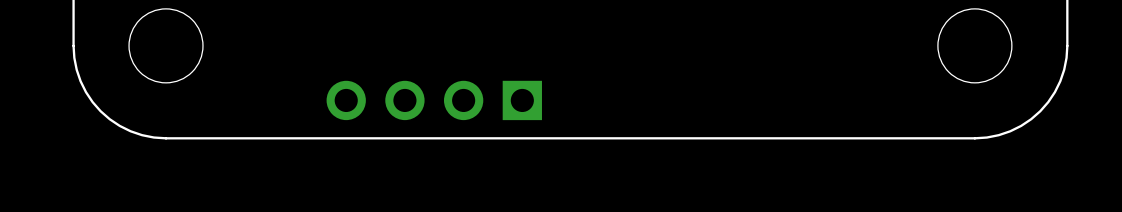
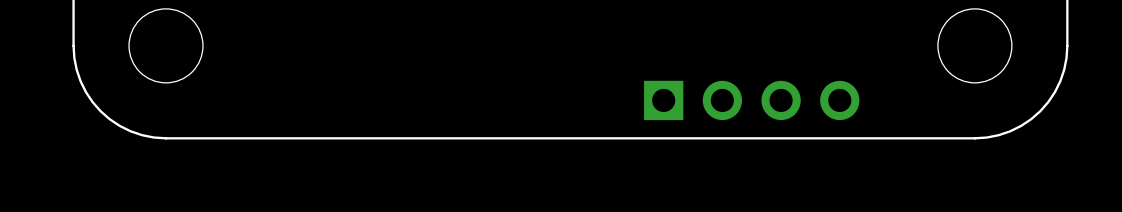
part rotation: 0° (434, 100) -> 180° (751, 100)
part position: (434, 100) -> (751, 100)

